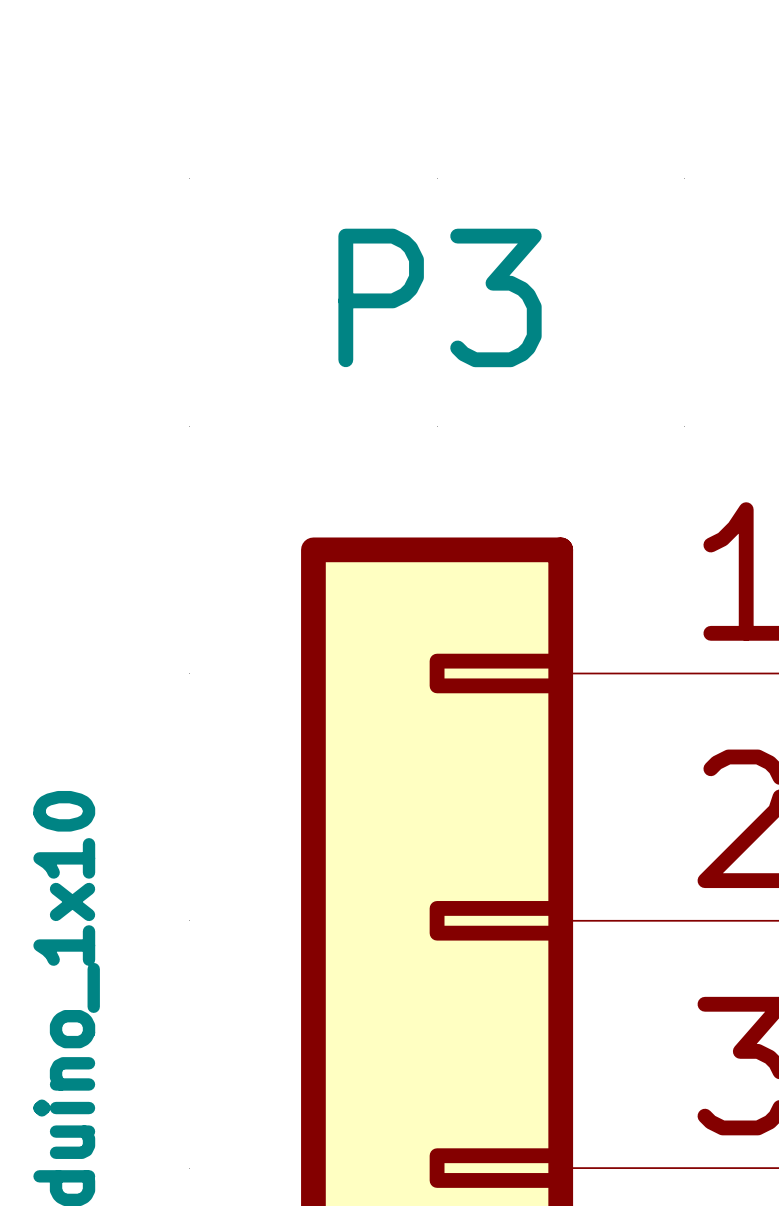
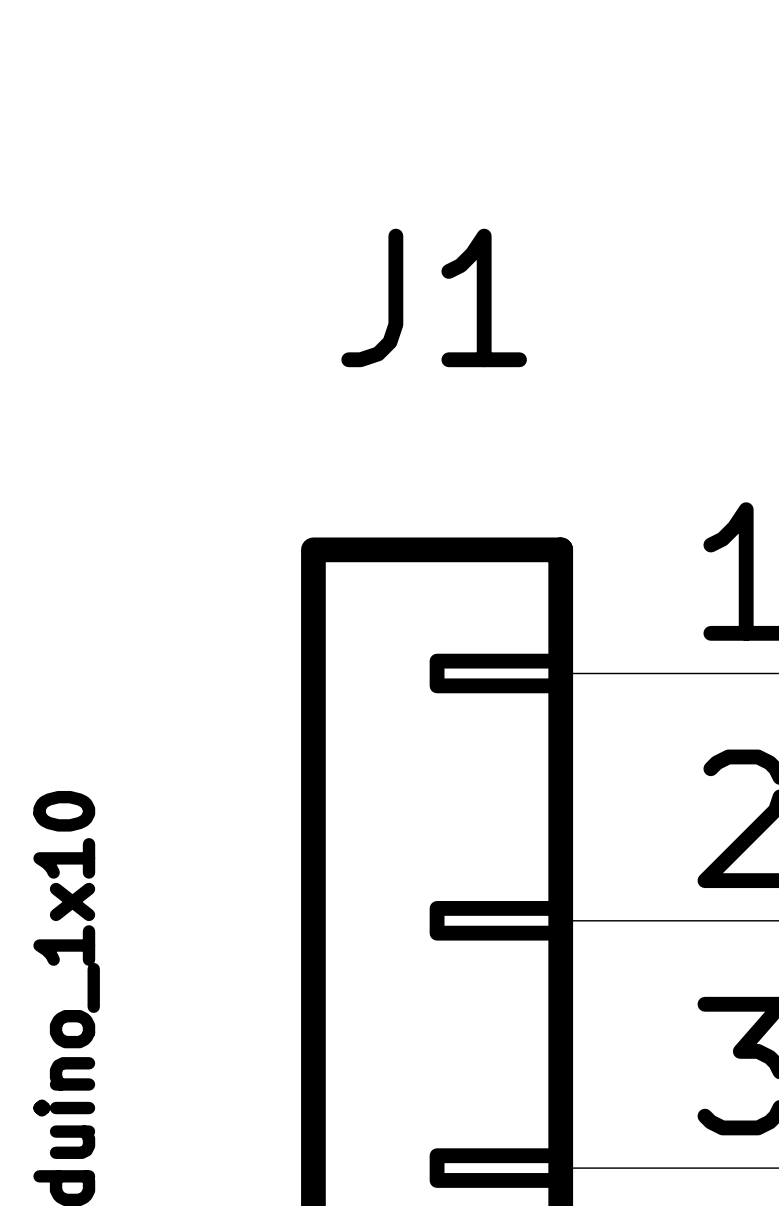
P3 name: P3 (440, 297) -> J1 (434, 297)

